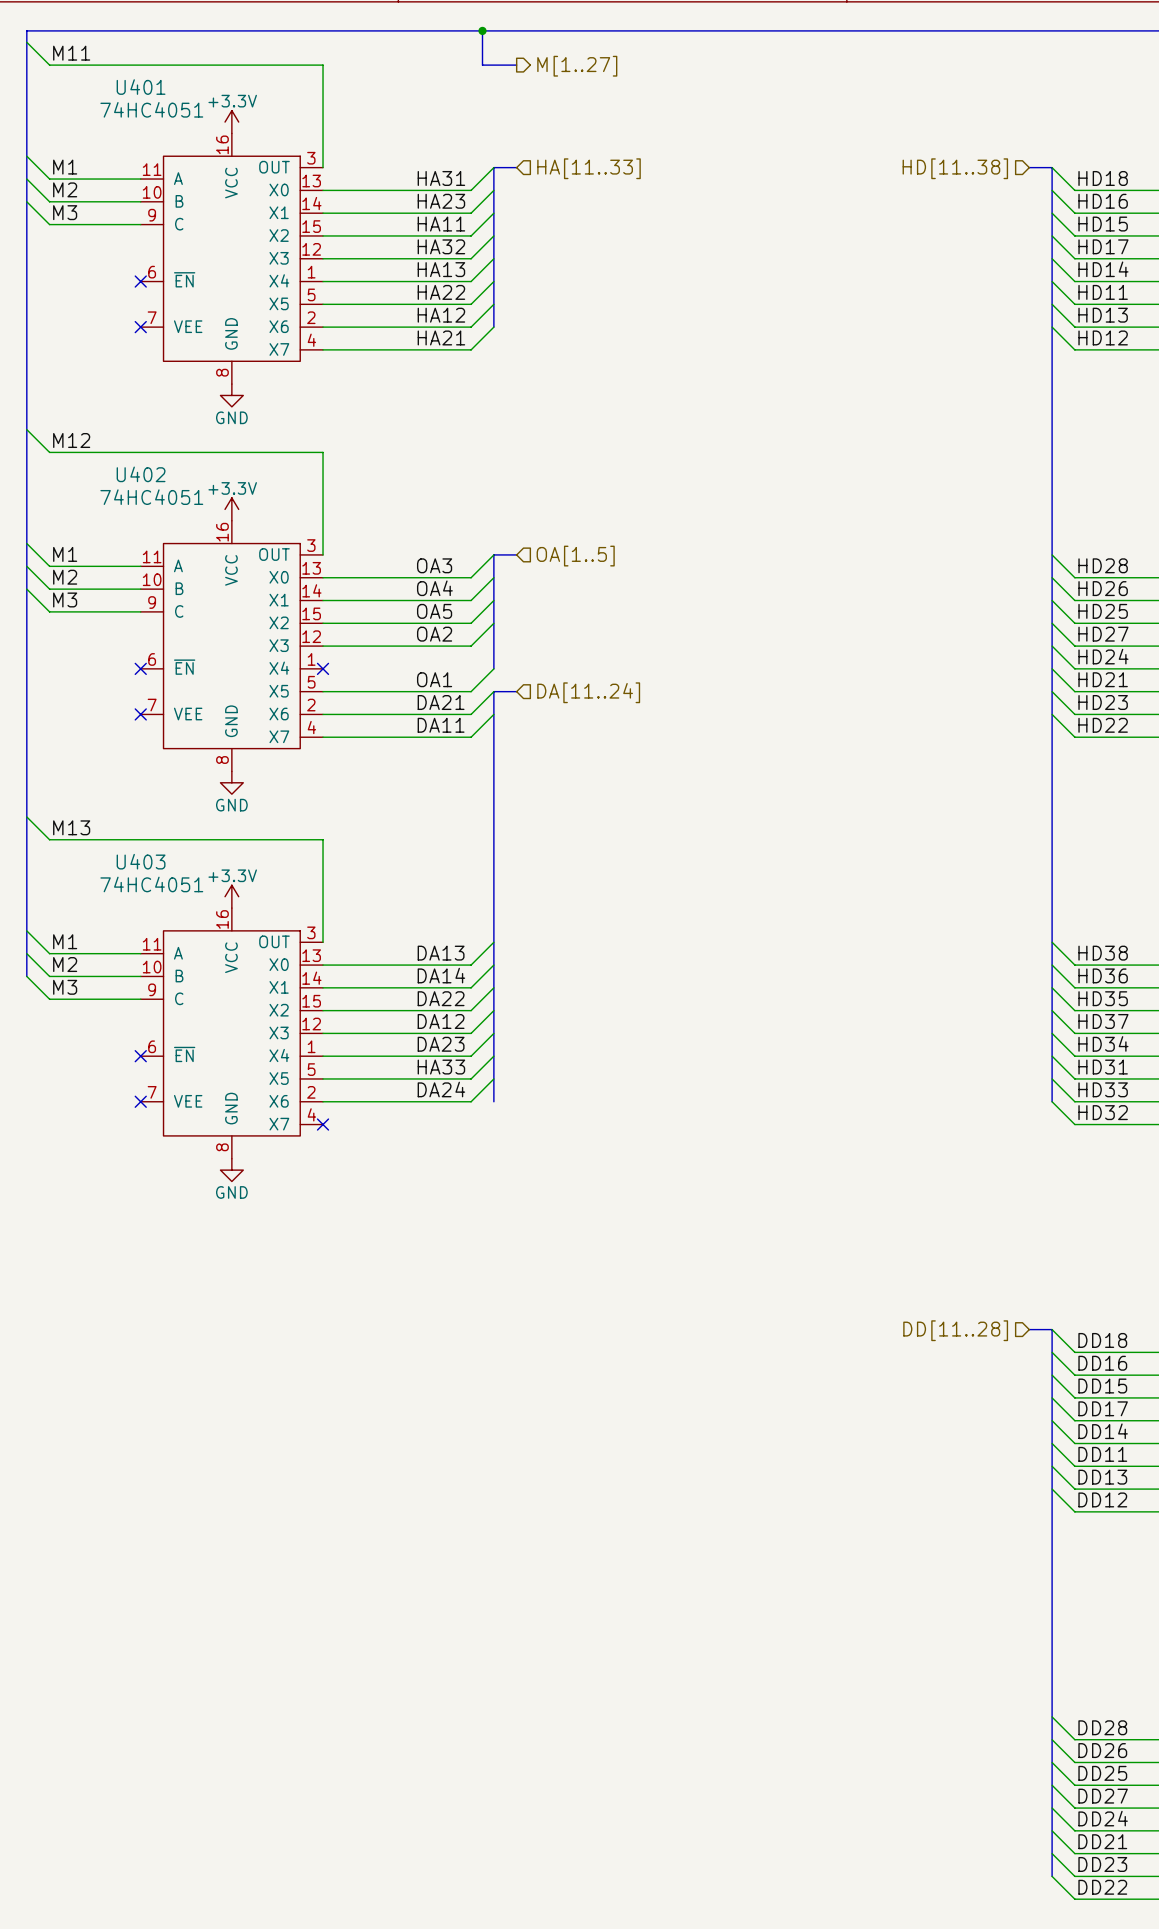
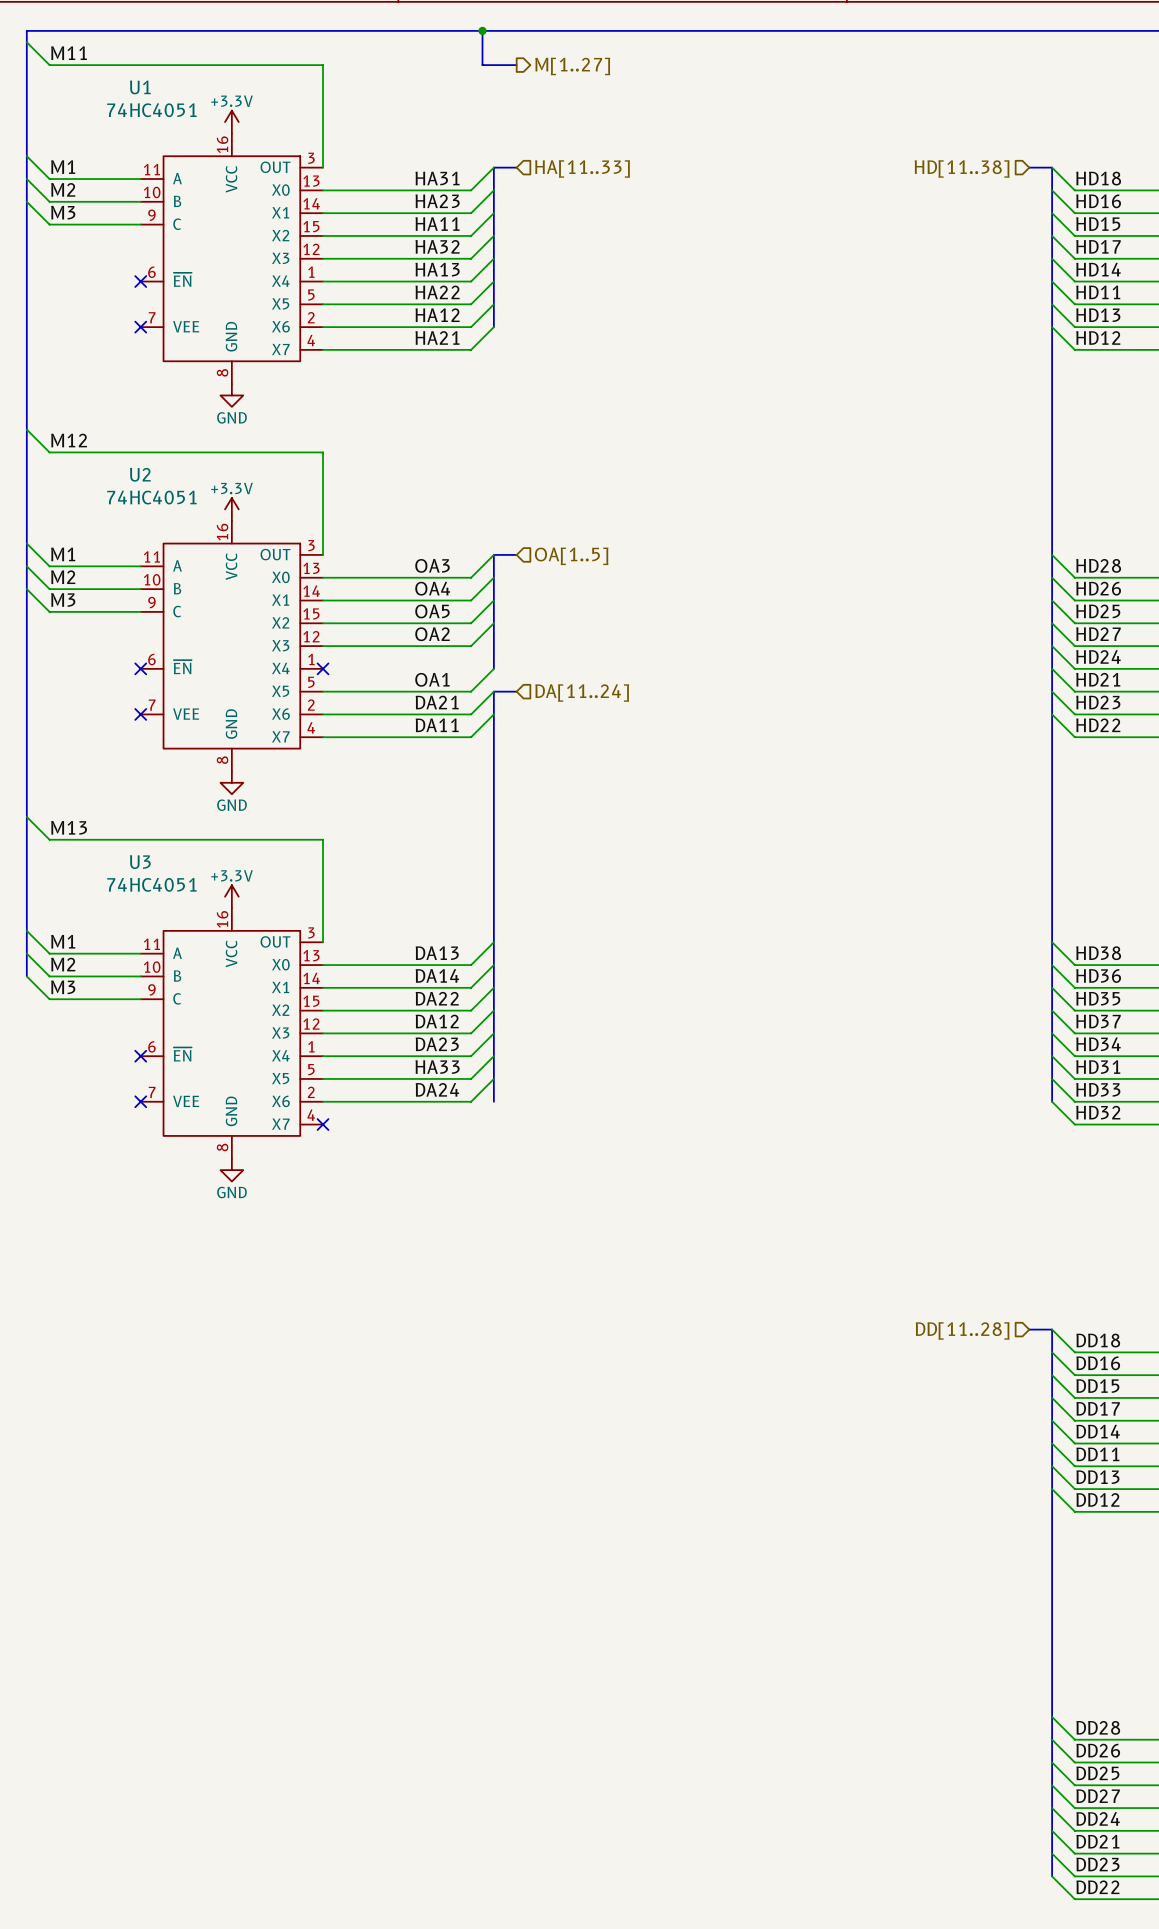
U401 name: U401 (141, 87) -> U1 (140, 87)
U402 name: U402 (141, 474) -> U2 (140, 474)
U403 name: U403 (141, 861) -> U3 (140, 862)

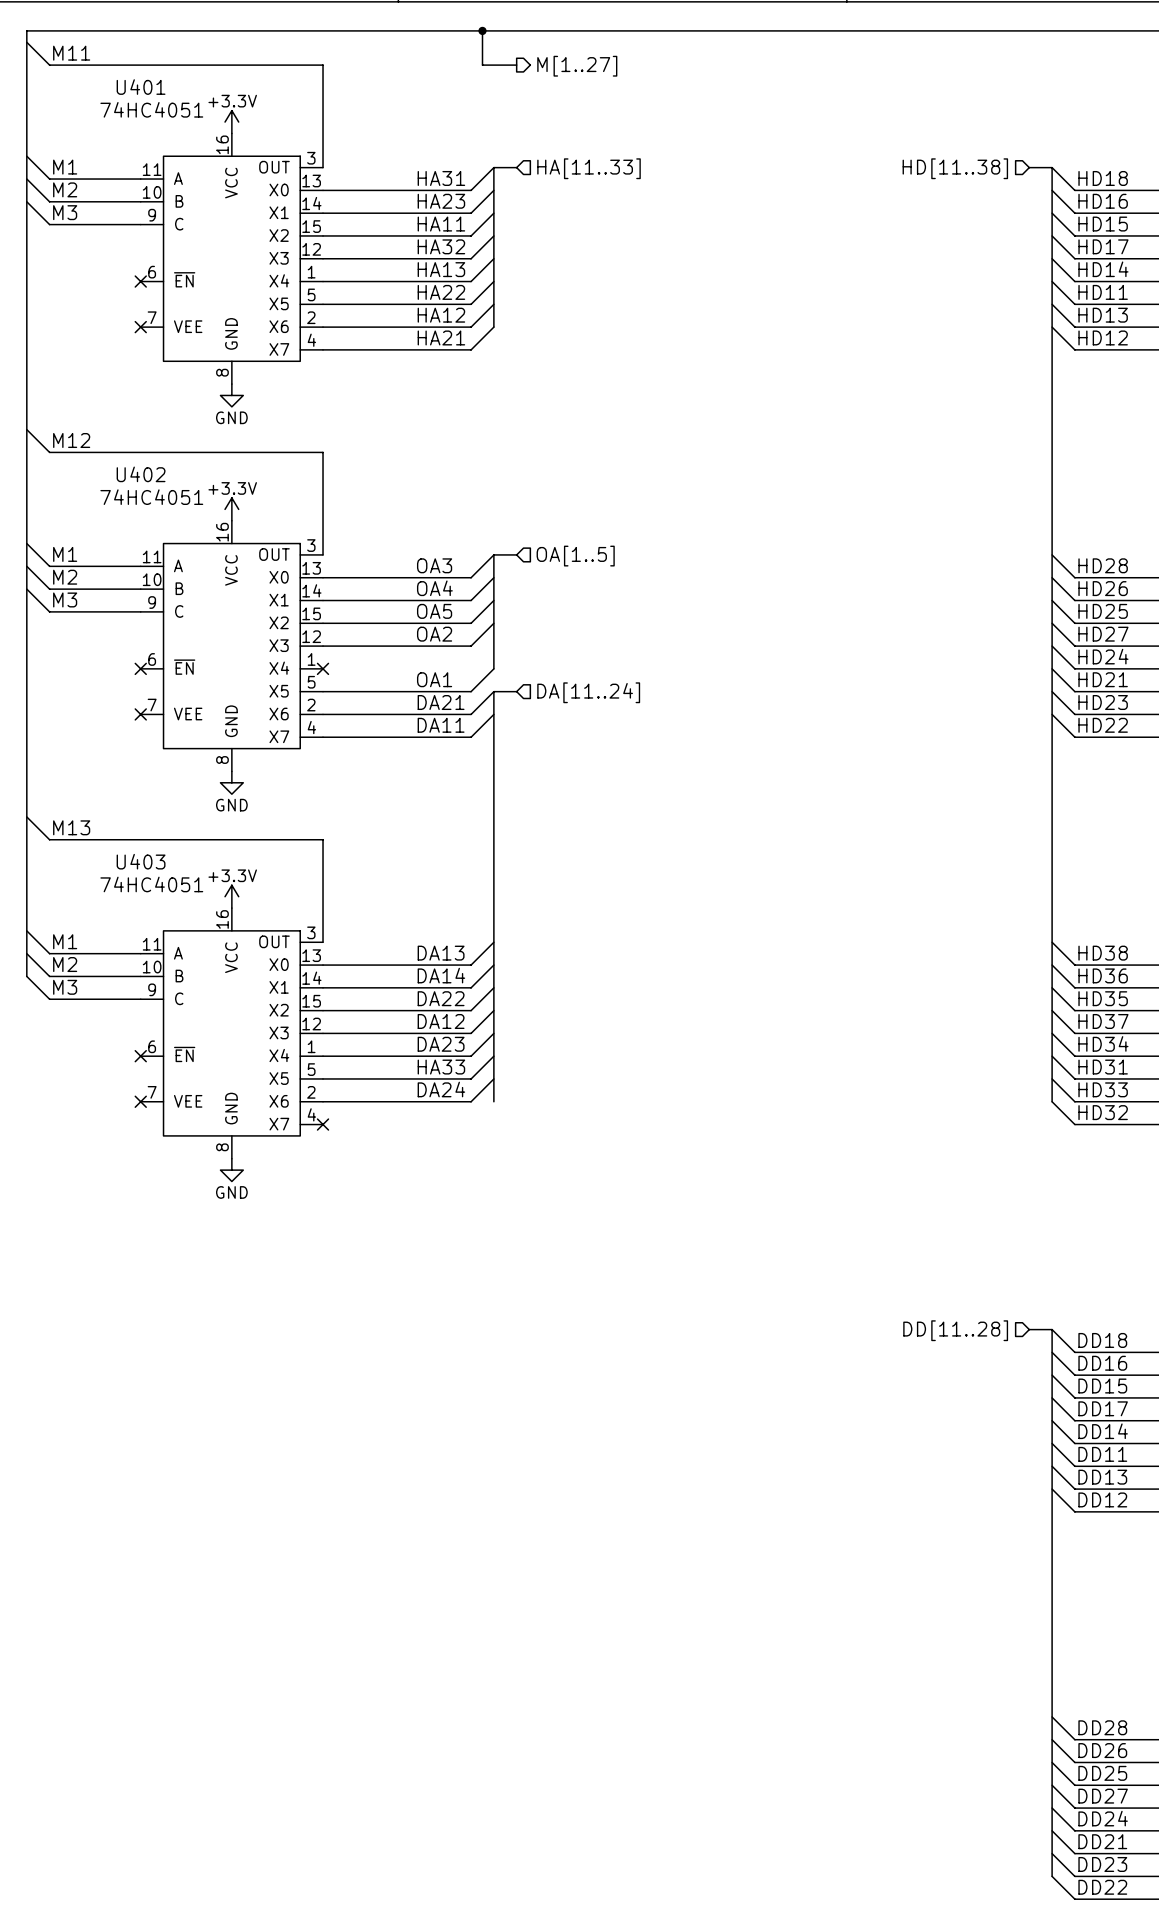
U1 name: U1 (140, 87) -> U401 (141, 87)
U2 name: U2 (140, 474) -> U402 (141, 474)
U3 name: U3 (140, 862) -> U403 (141, 861)

